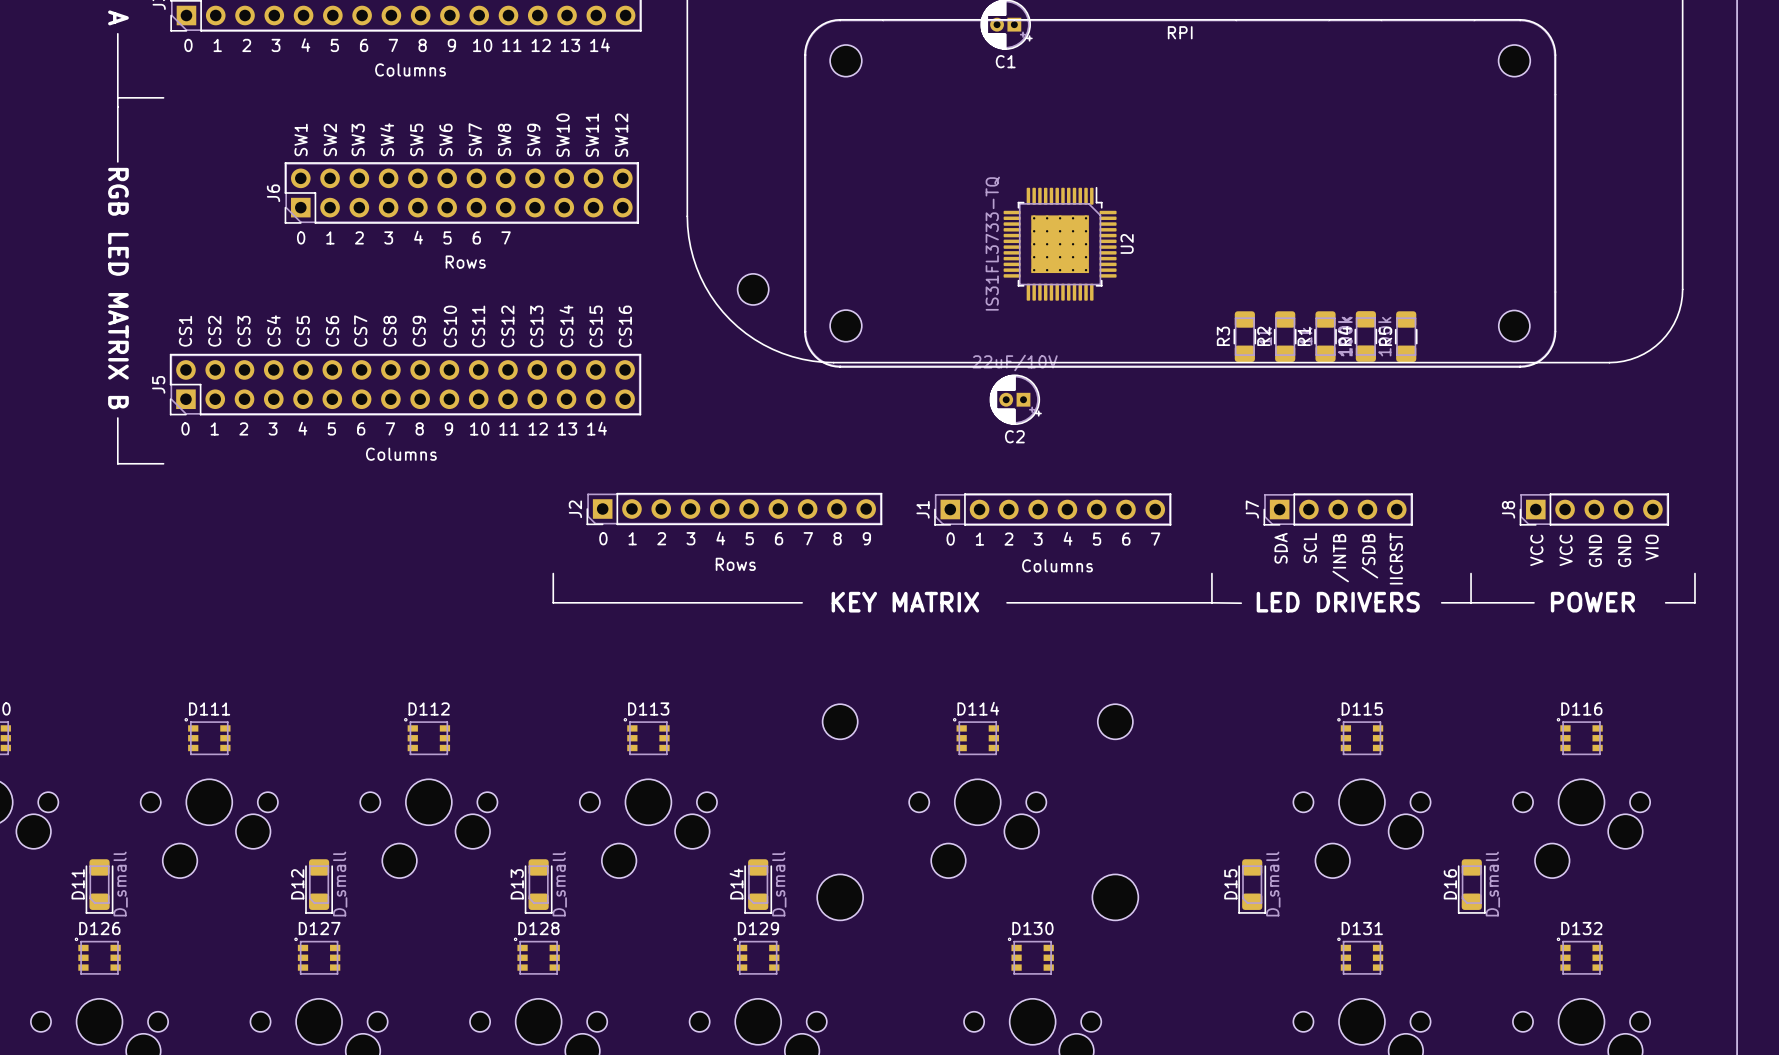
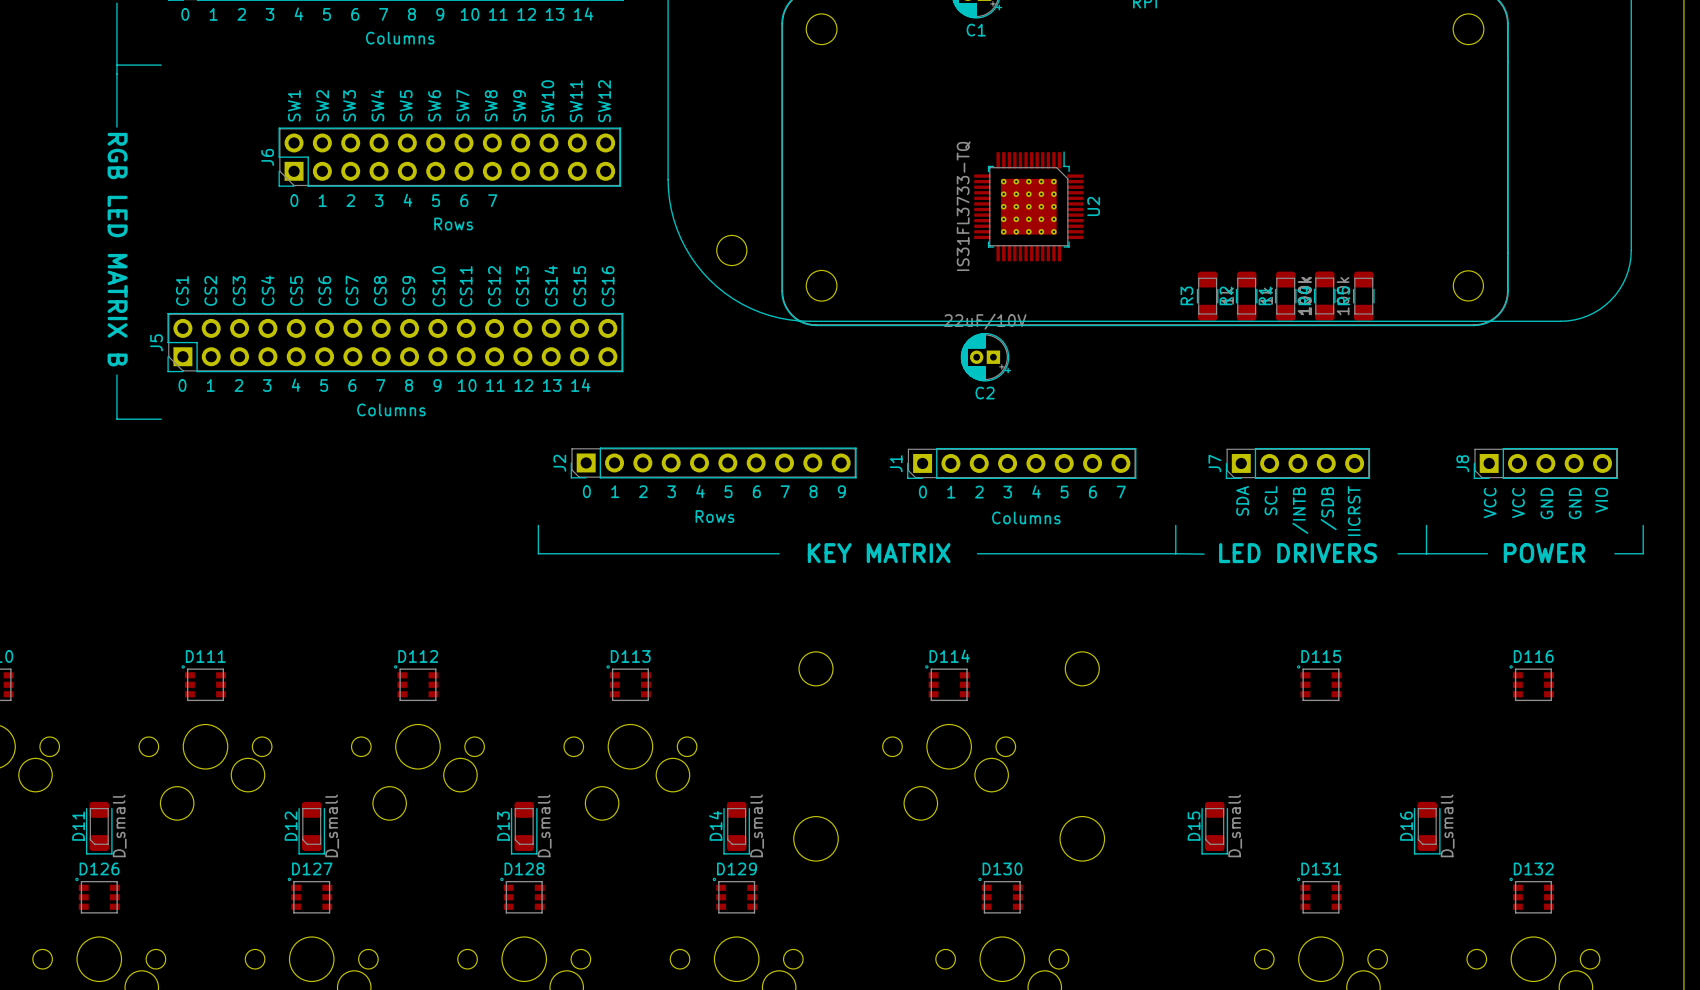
part: (1361, 828) -> none
part: (1581, 828) -> none

